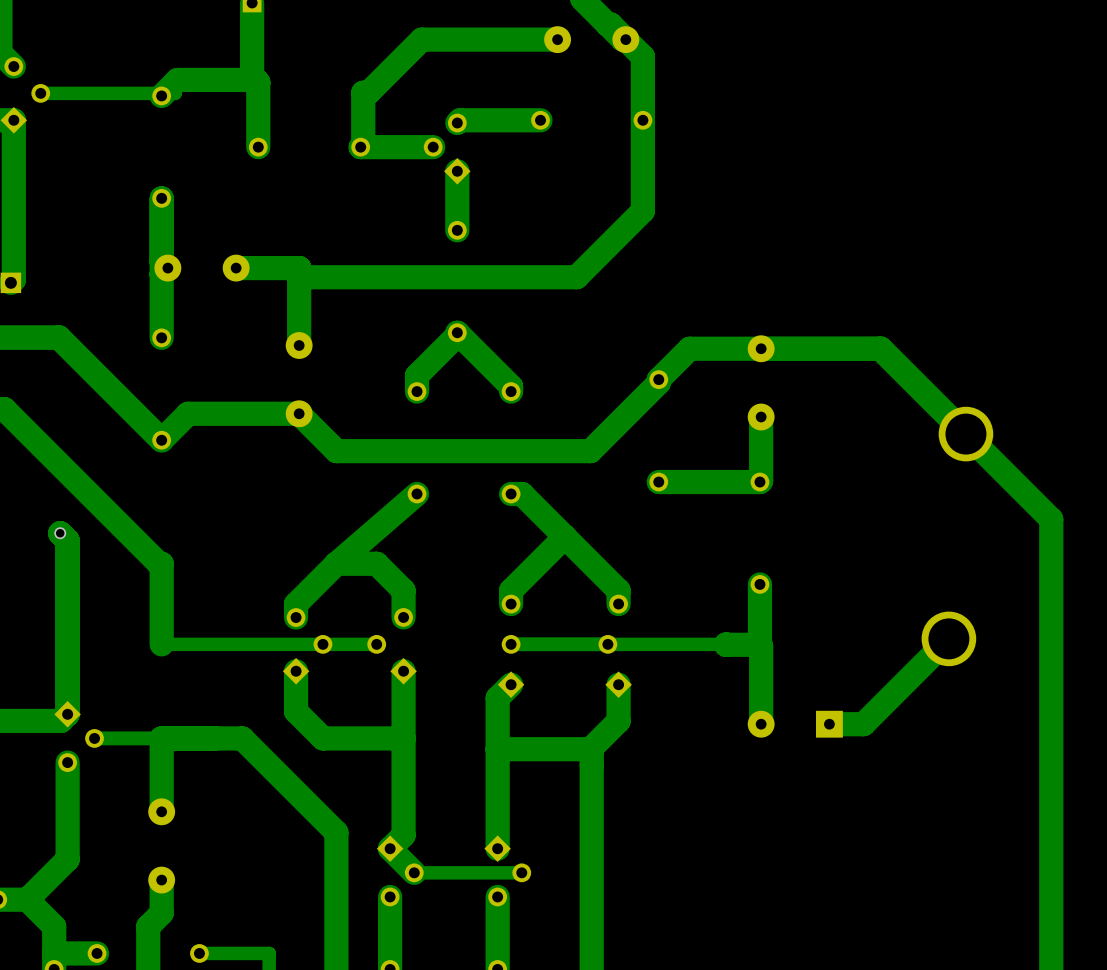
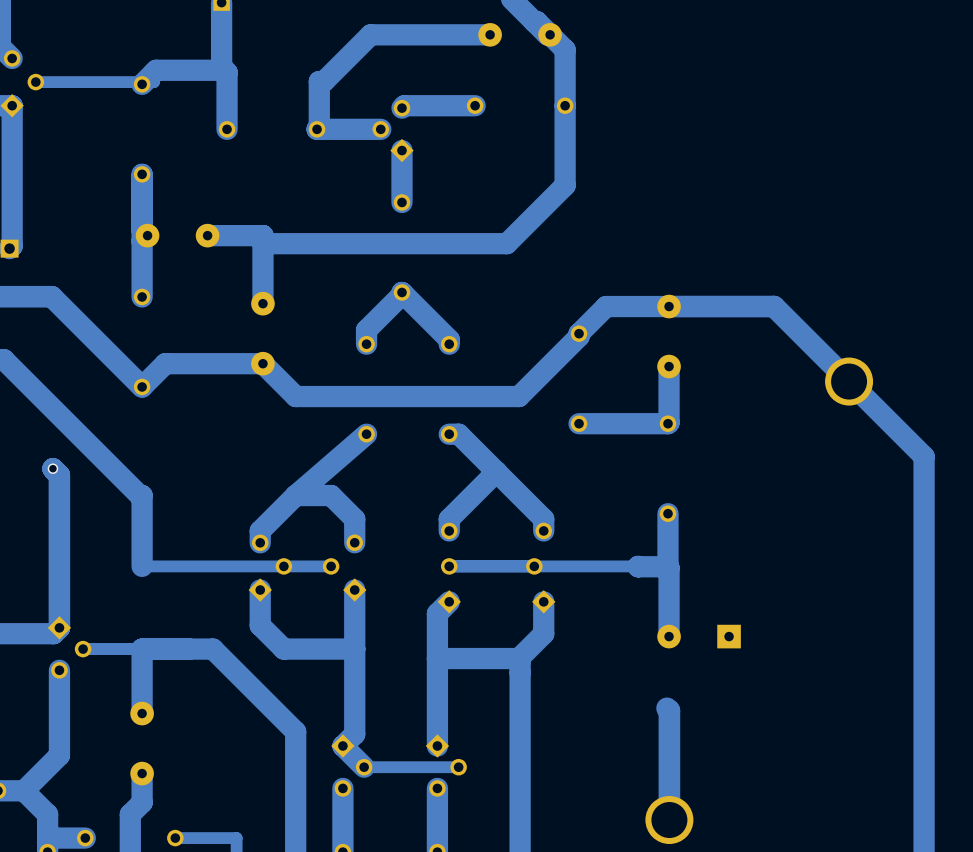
track: (948, 638) (863, 724) (829, 724) -> none
part: (948, 638) -> none
track: none -> (667, 708) (669, 710) (669, 820)
part: none -> (669, 820)

